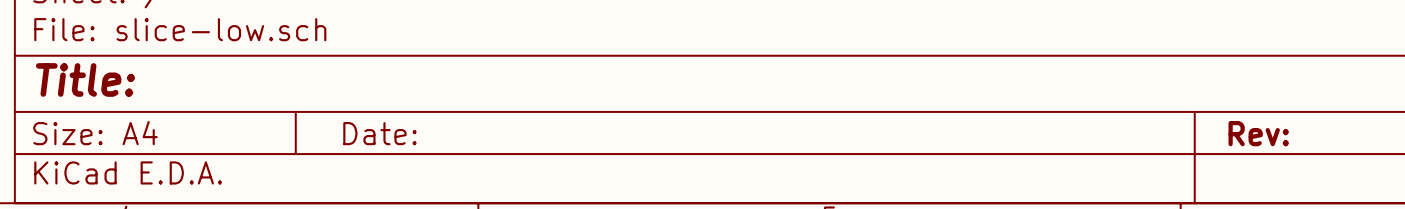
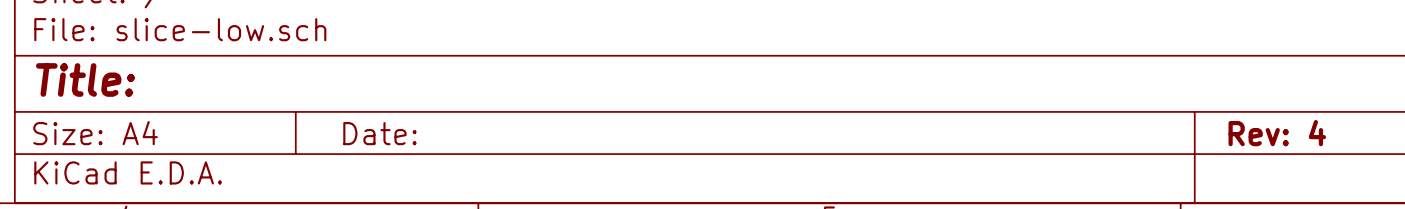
title block: Rev: (1258, 133) -> Rev: 4 (1277, 133)

